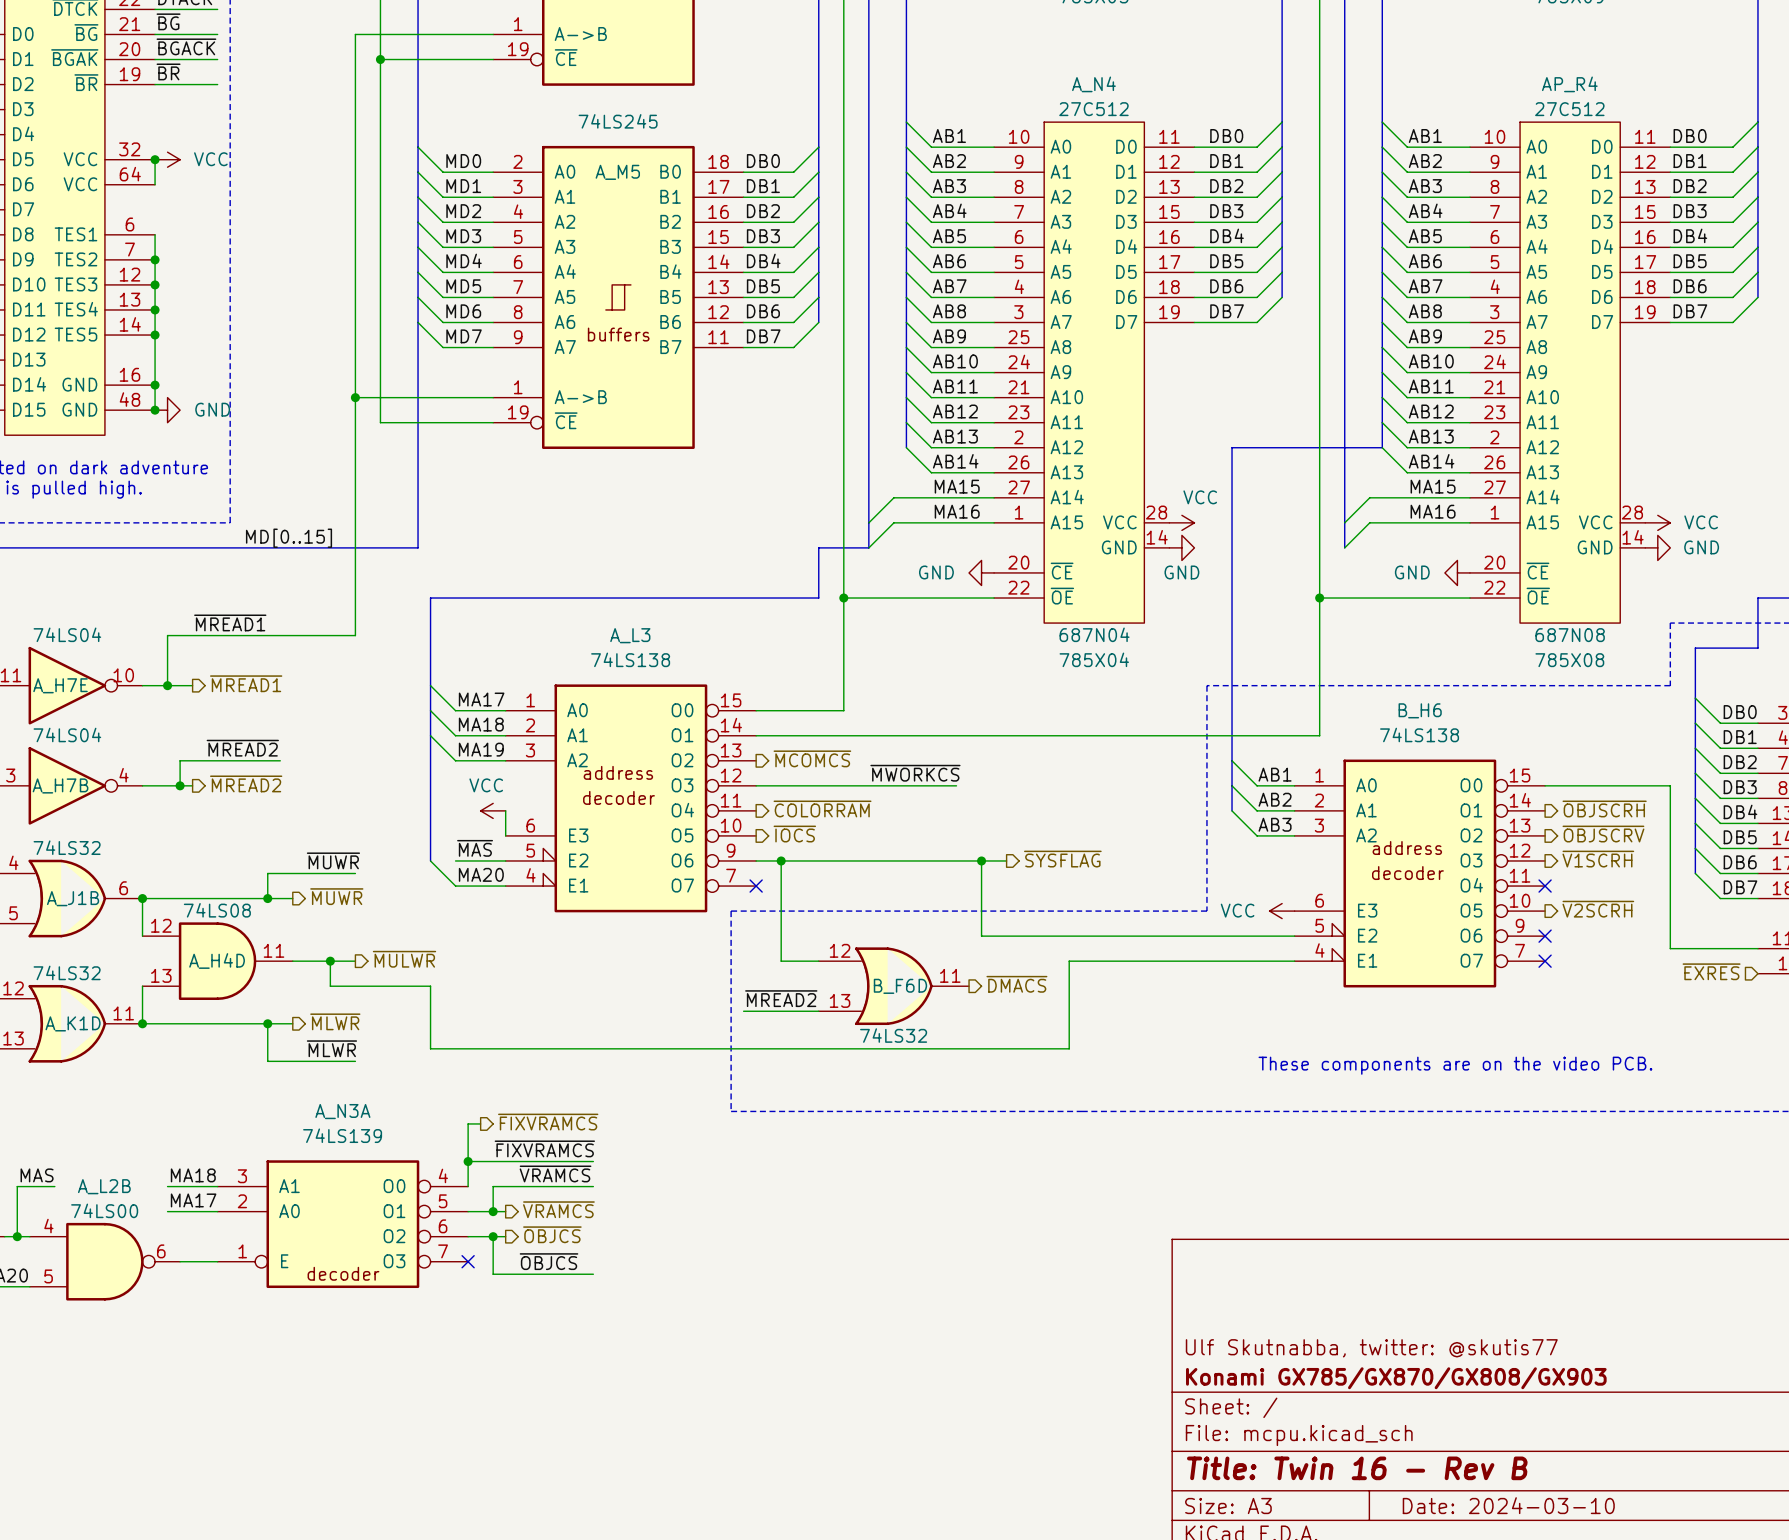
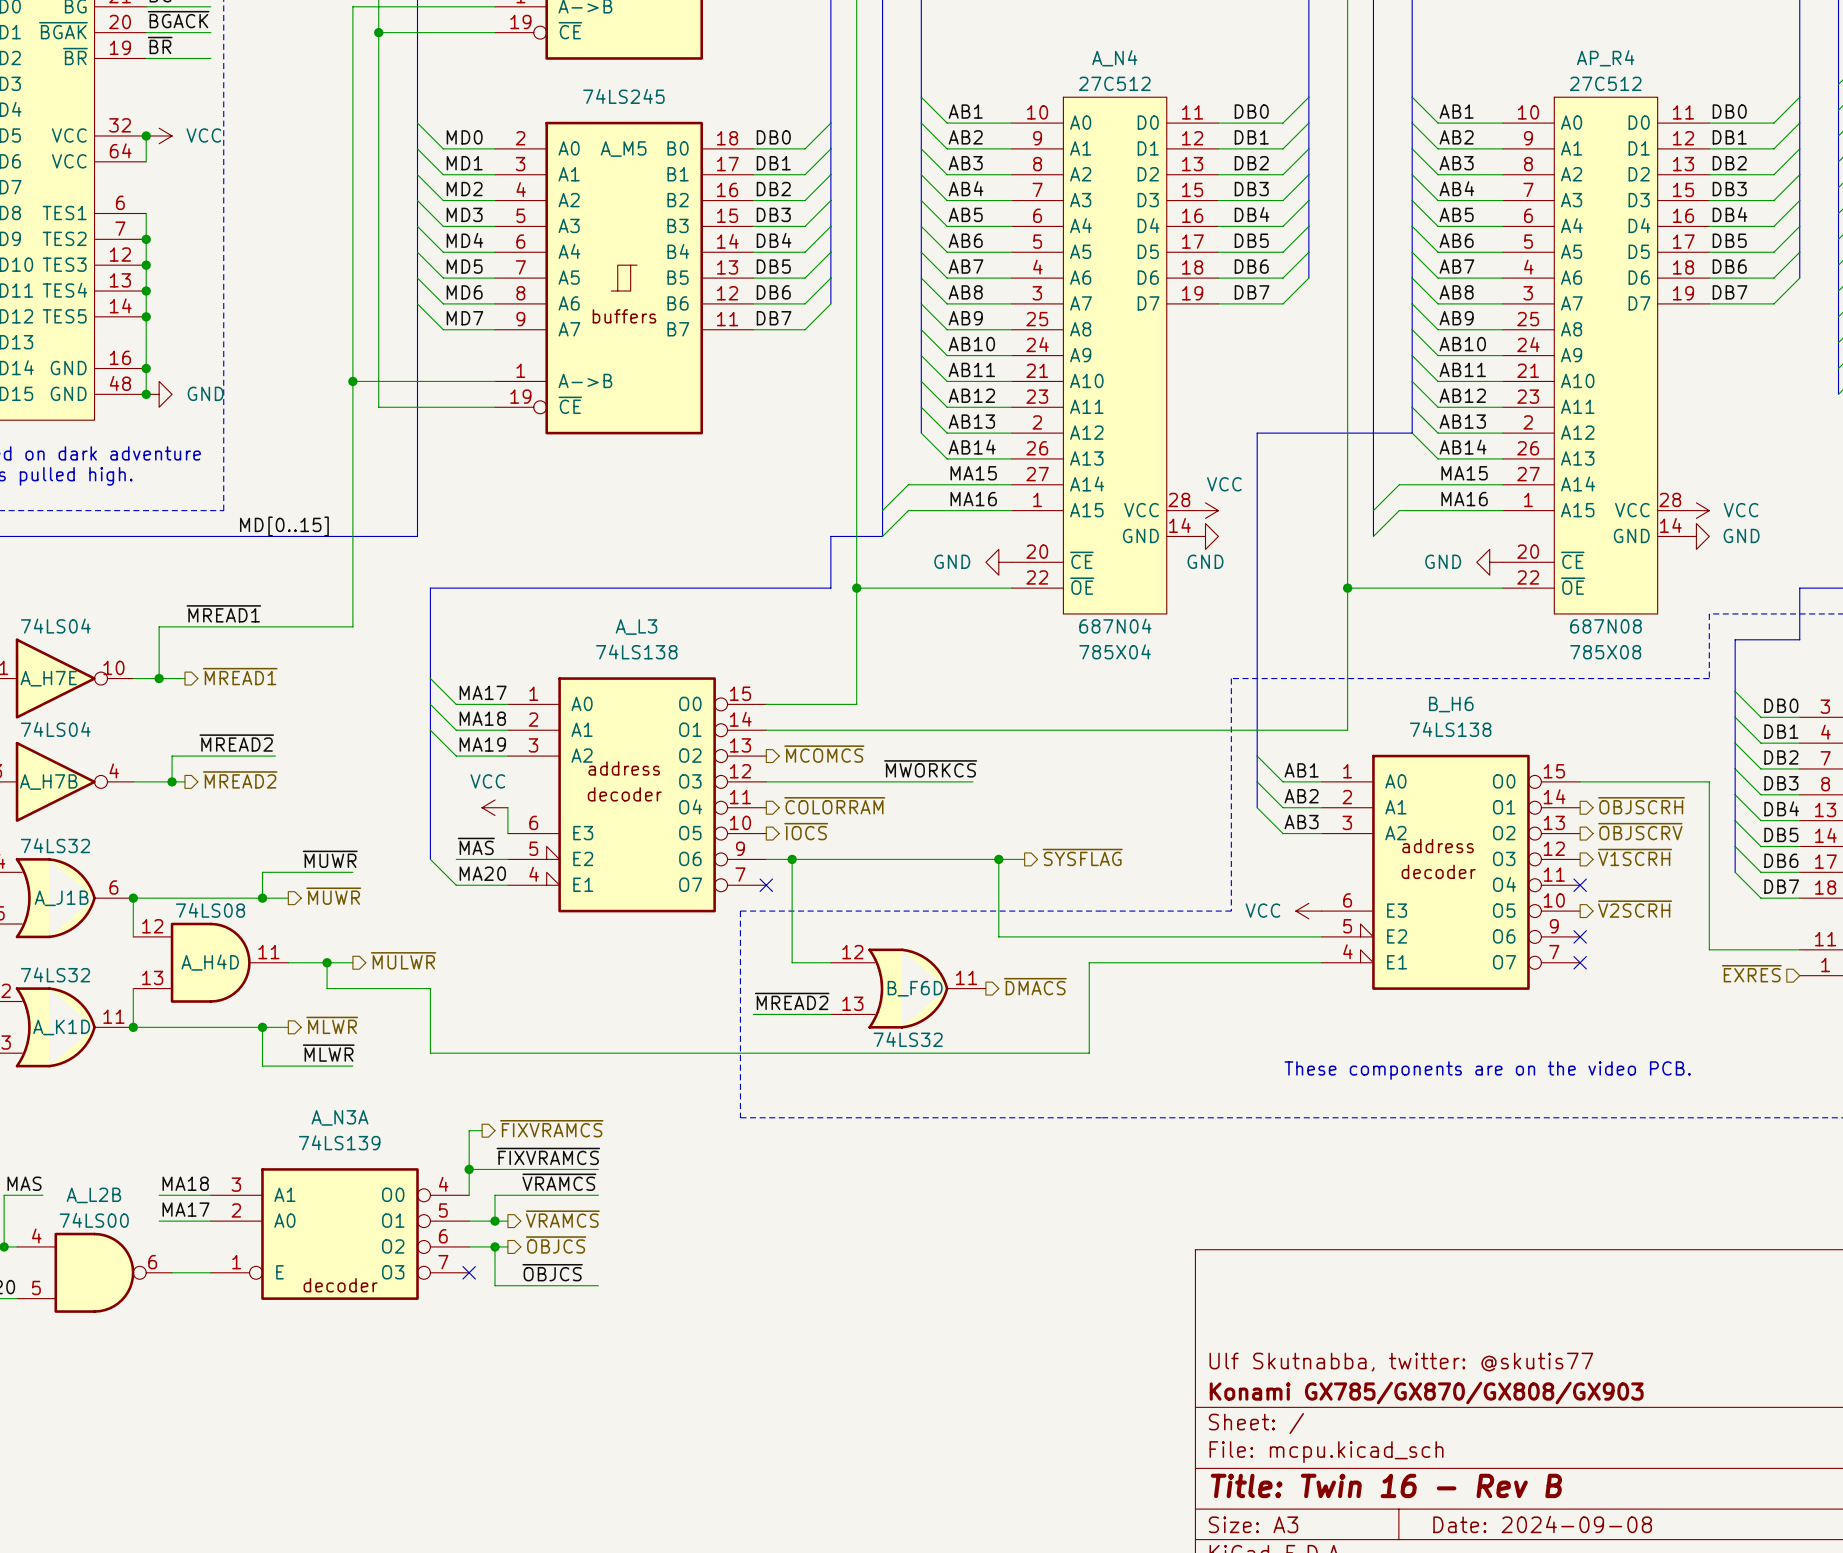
title block: Date: 2024-03-10 (1508, 1505) -> Date: 2024-09-08 (1542, 1524)

